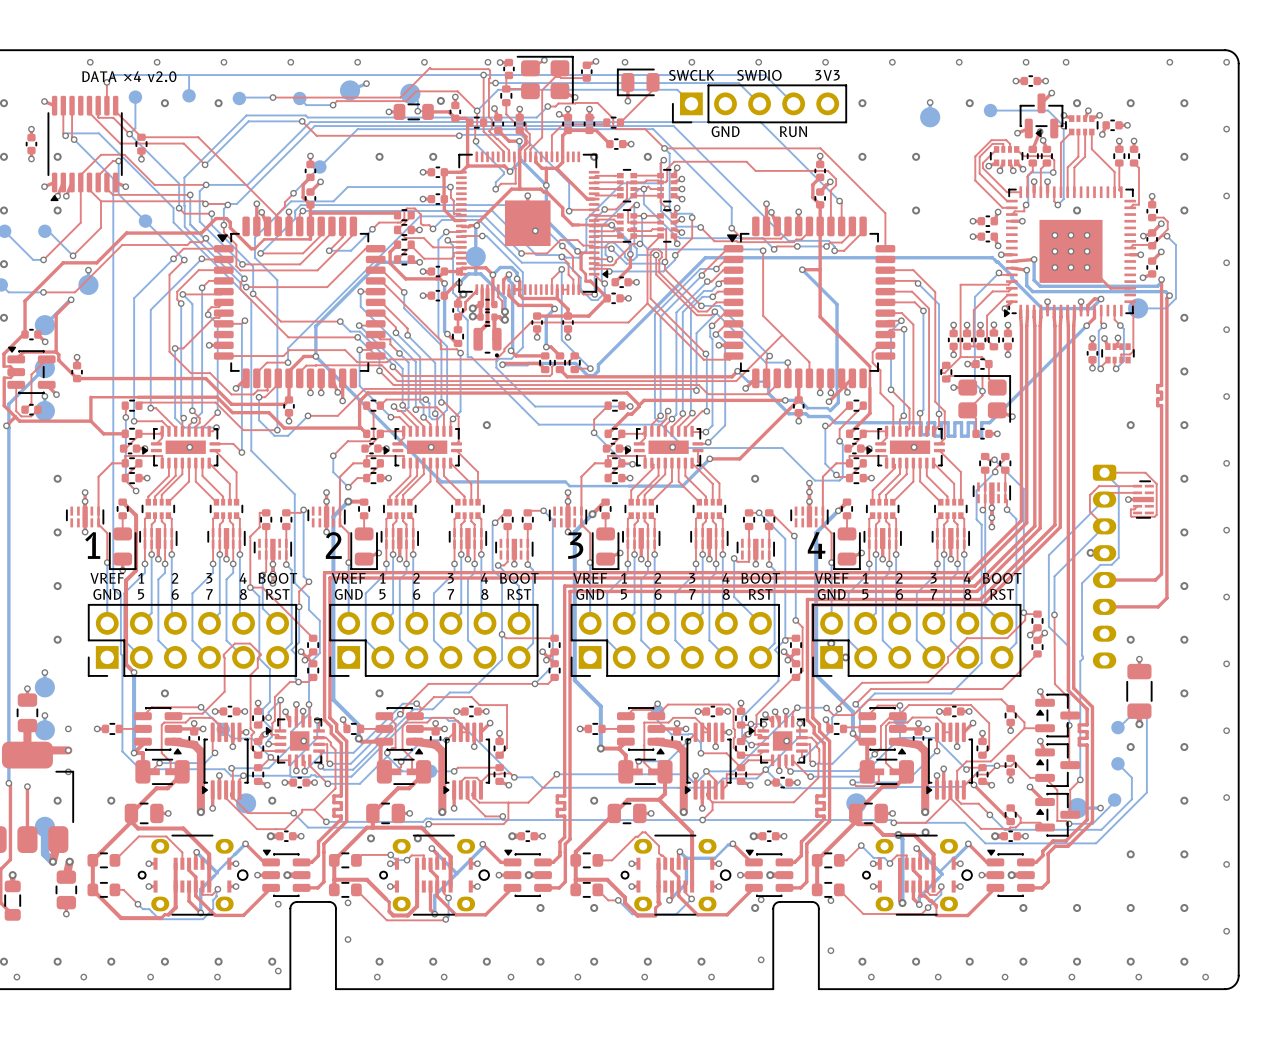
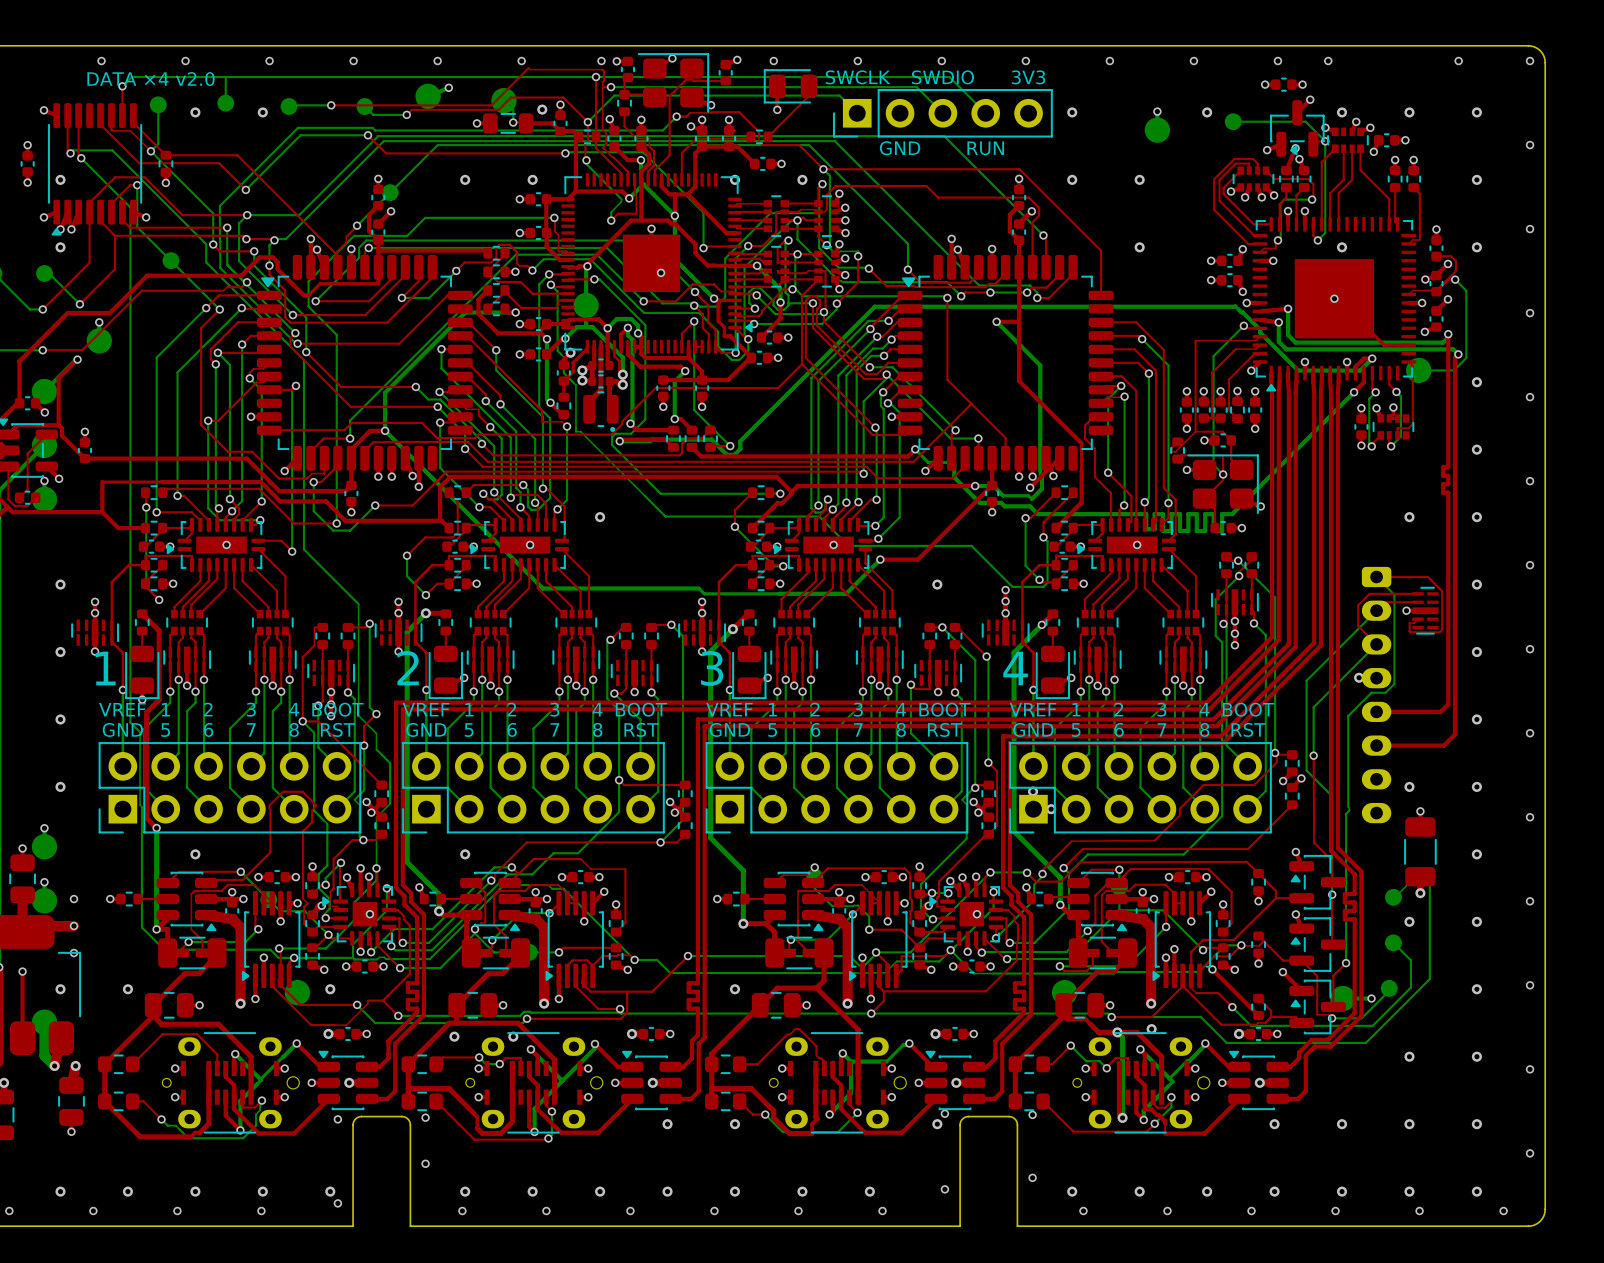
part footprint: [1003, 186, 1137, 318] -> [1252, 216, 1417, 392]
via: (1054, 235) -> none
via: (1071, 235) -> none
via: (1087, 235) -> none
via: (1054, 251) -> none
via: (1087, 251) -> none
via: (1054, 267) -> none
via: (1071, 267) -> none
via: (1087, 267) -> none

